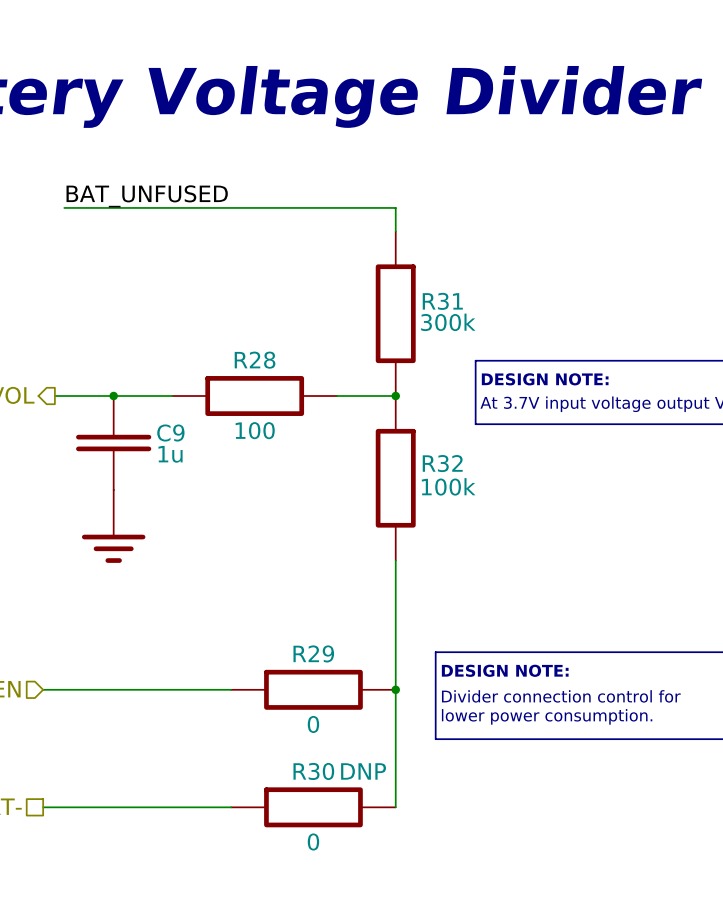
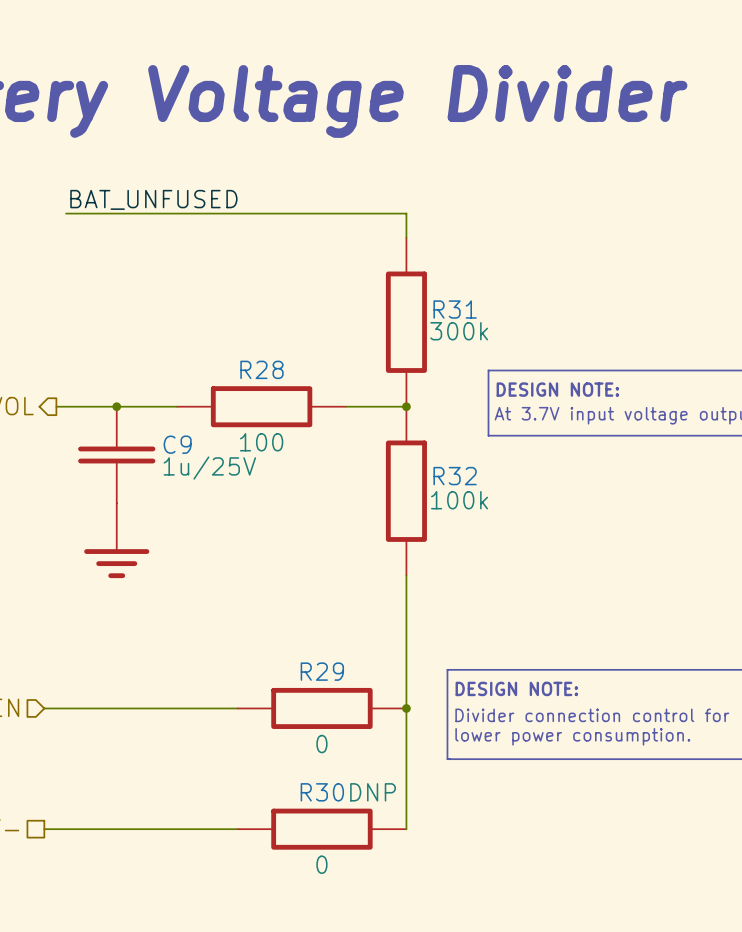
C9 value: 1u (170, 454) -> 1u/25V (209, 468)

